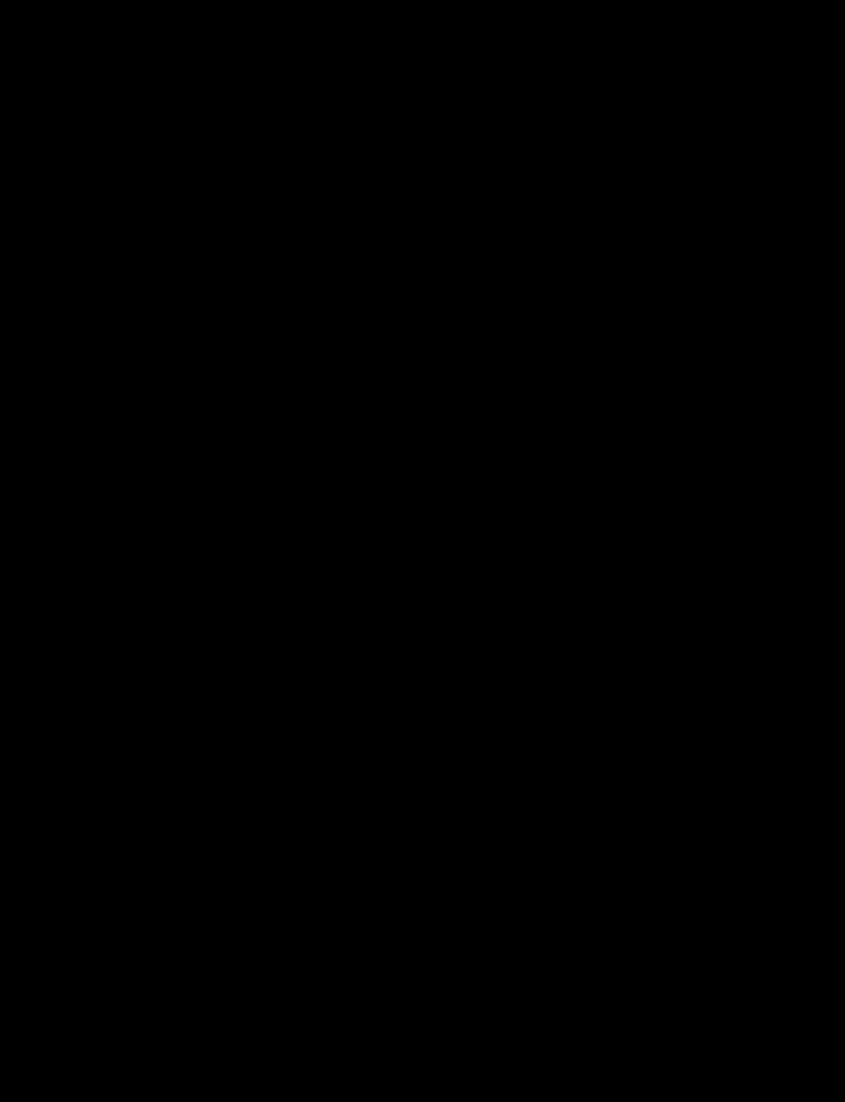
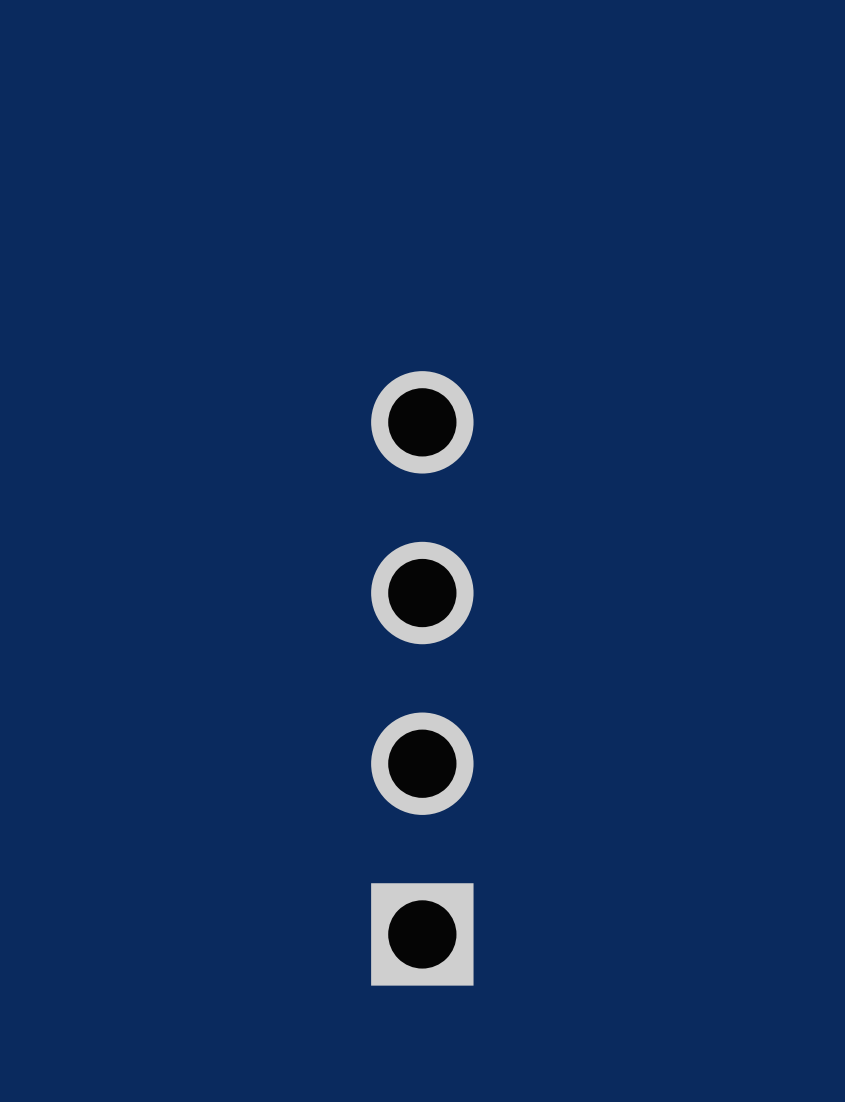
part: none -> (422, 678)

